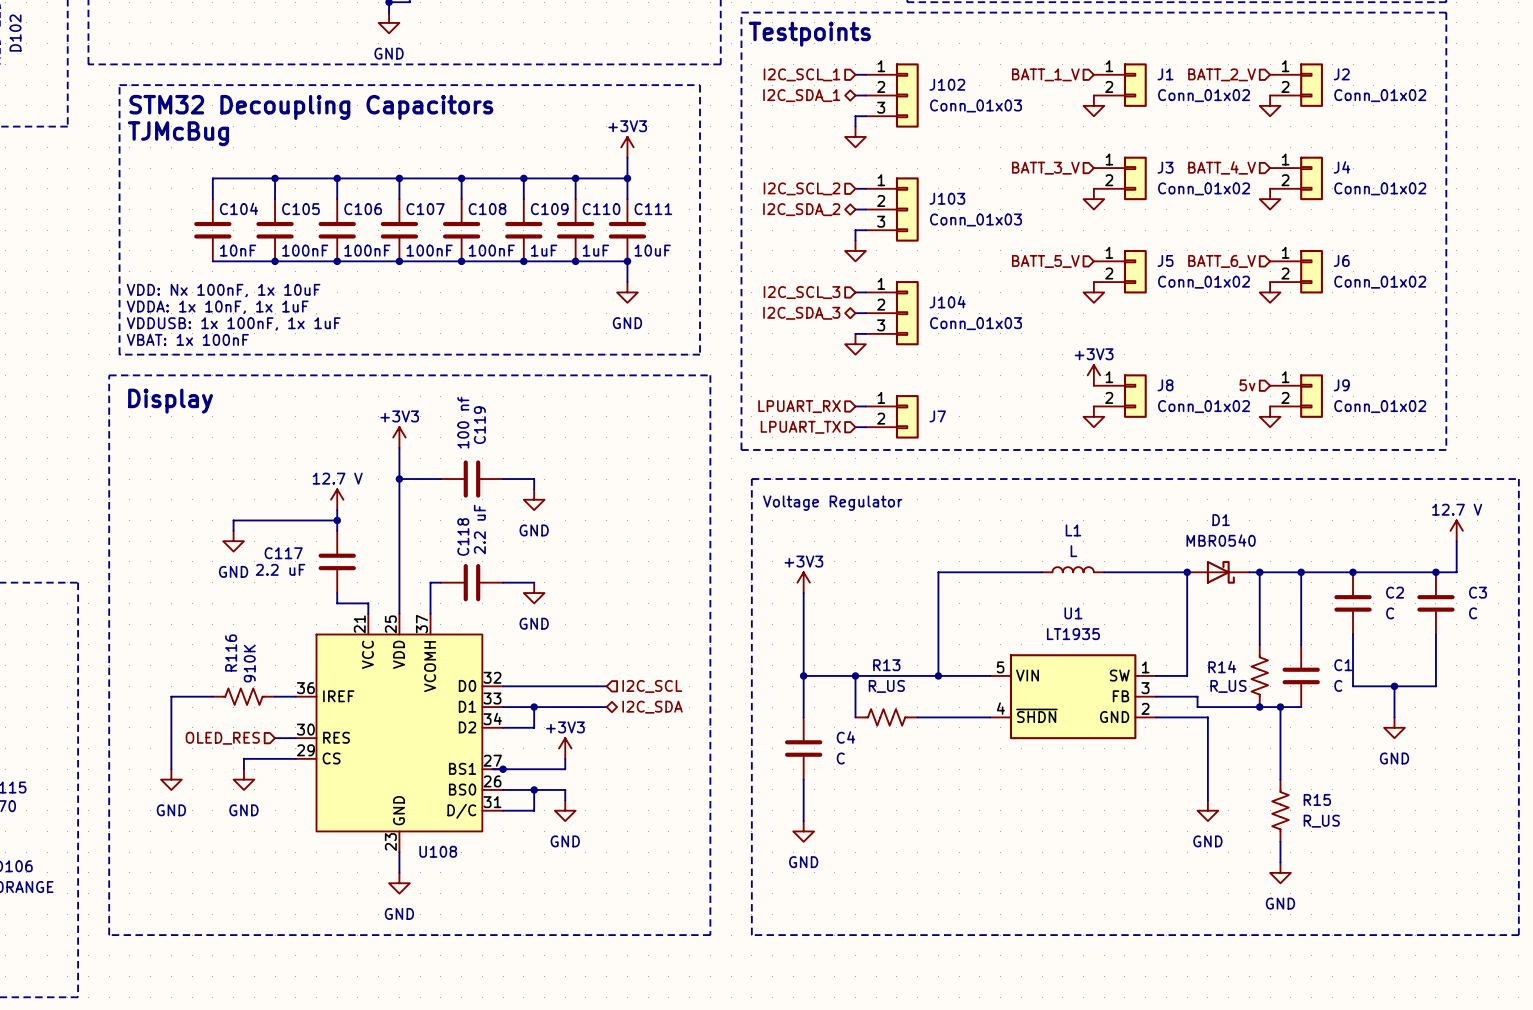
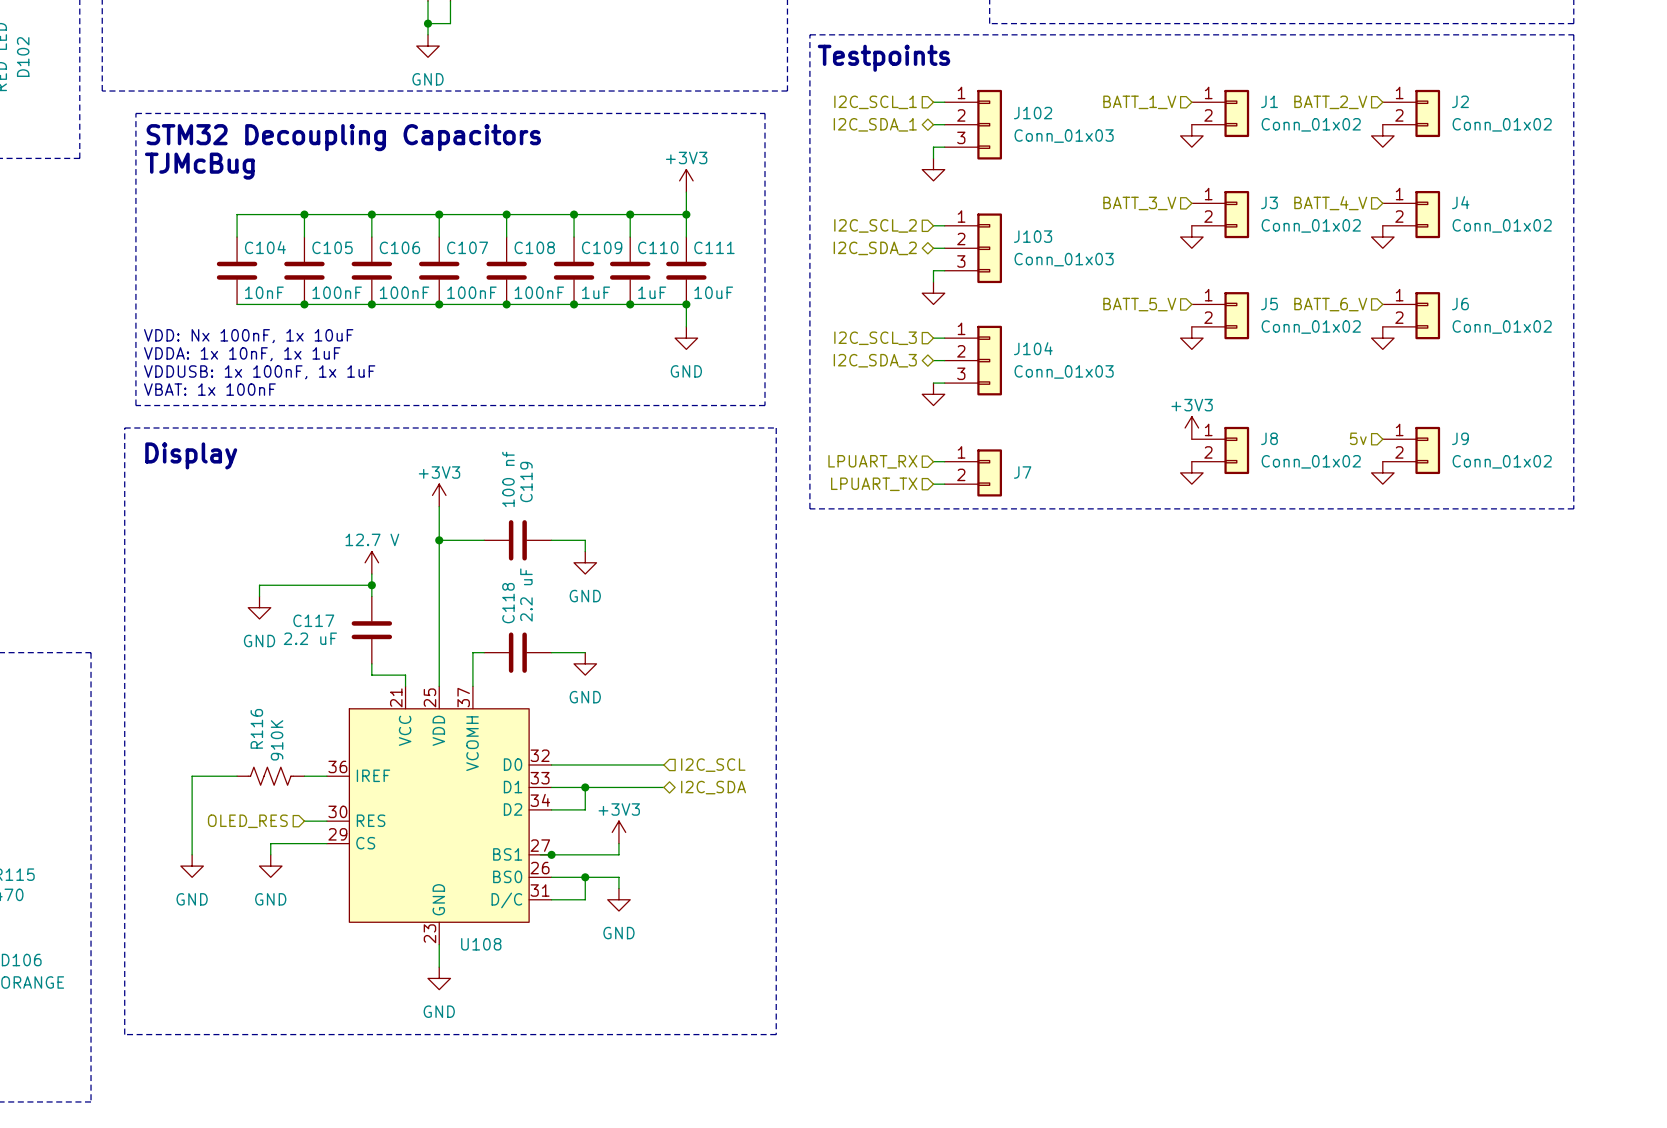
line: (751, 479) (1518, 479) (1518, 935) (751, 935) (751, 479) -> none
text: Voltage Regulator (832, 503) -> none
power symbol: 12.7 V (1456, 530) -> none
wire: (1456, 541) (1456, 572) (1249, 572) -> none
L1: L (1073, 569) -> none
wire: (1042, 572) (938, 572) (938, 675) -> none
wire: (1104, 572) (1187, 572) (1187, 675) (1156, 675) -> none
junction: (1187, 572) -> none
D1: MBR0540 (1218, 572) -> none
wire: (1259, 572) (1259, 644) -> none
junction: (1259, 572) -> none
wire: (1301, 572) (1301, 644) -> none
junction: (1301, 572) -> none
junction: (1353, 572) -> none
junction: (1435, 572) -> none
power symbol: +3V3 (803, 582) -> none
wire: (803, 593) (803, 717) -> none
C2: C (1353, 603) -> none
C3: C (1435, 603) -> none
wire: (1353, 634) (1353, 686) (1435, 686) (1435, 634) -> none
wire: (803, 675) (990, 675) -> none
junction: (803, 675) -> none
wire: (855, 675) (855, 717) -> none
junction: (855, 675) -> none
junction: (938, 675) -> none
R14: R_US (1259, 675) -> none
C1: C (1301, 675) -> none
wire: (1394, 686) (1394, 717) -> none
junction: (1394, 686) -> none
U1: LT1935 (1073, 696) -> none
wire: (1156, 696) (1197, 696) (1197, 707) (1301, 707) -> none
junction: (1259, 707) -> none
wire: (1280, 707) (1280, 779) -> none
junction: (1280, 707) -> none
R13: R_US (886, 717) -> none
wire: (917, 717) (990, 717) -> none
wire: (1156, 717) (1207, 717) (1207, 800) -> none
power symbol: GND (1394, 727) -> none
C4: C (803, 748) -> none
wire: (803, 779) (803, 821) -> none
power symbol: GND (1207, 810) -> none
R15: R_US (1280, 810) -> none
power symbol: GND (803, 831) -> none
wire: (1280, 841) (1280, 862) -> none
power symbol: GND (1280, 872) -> none

